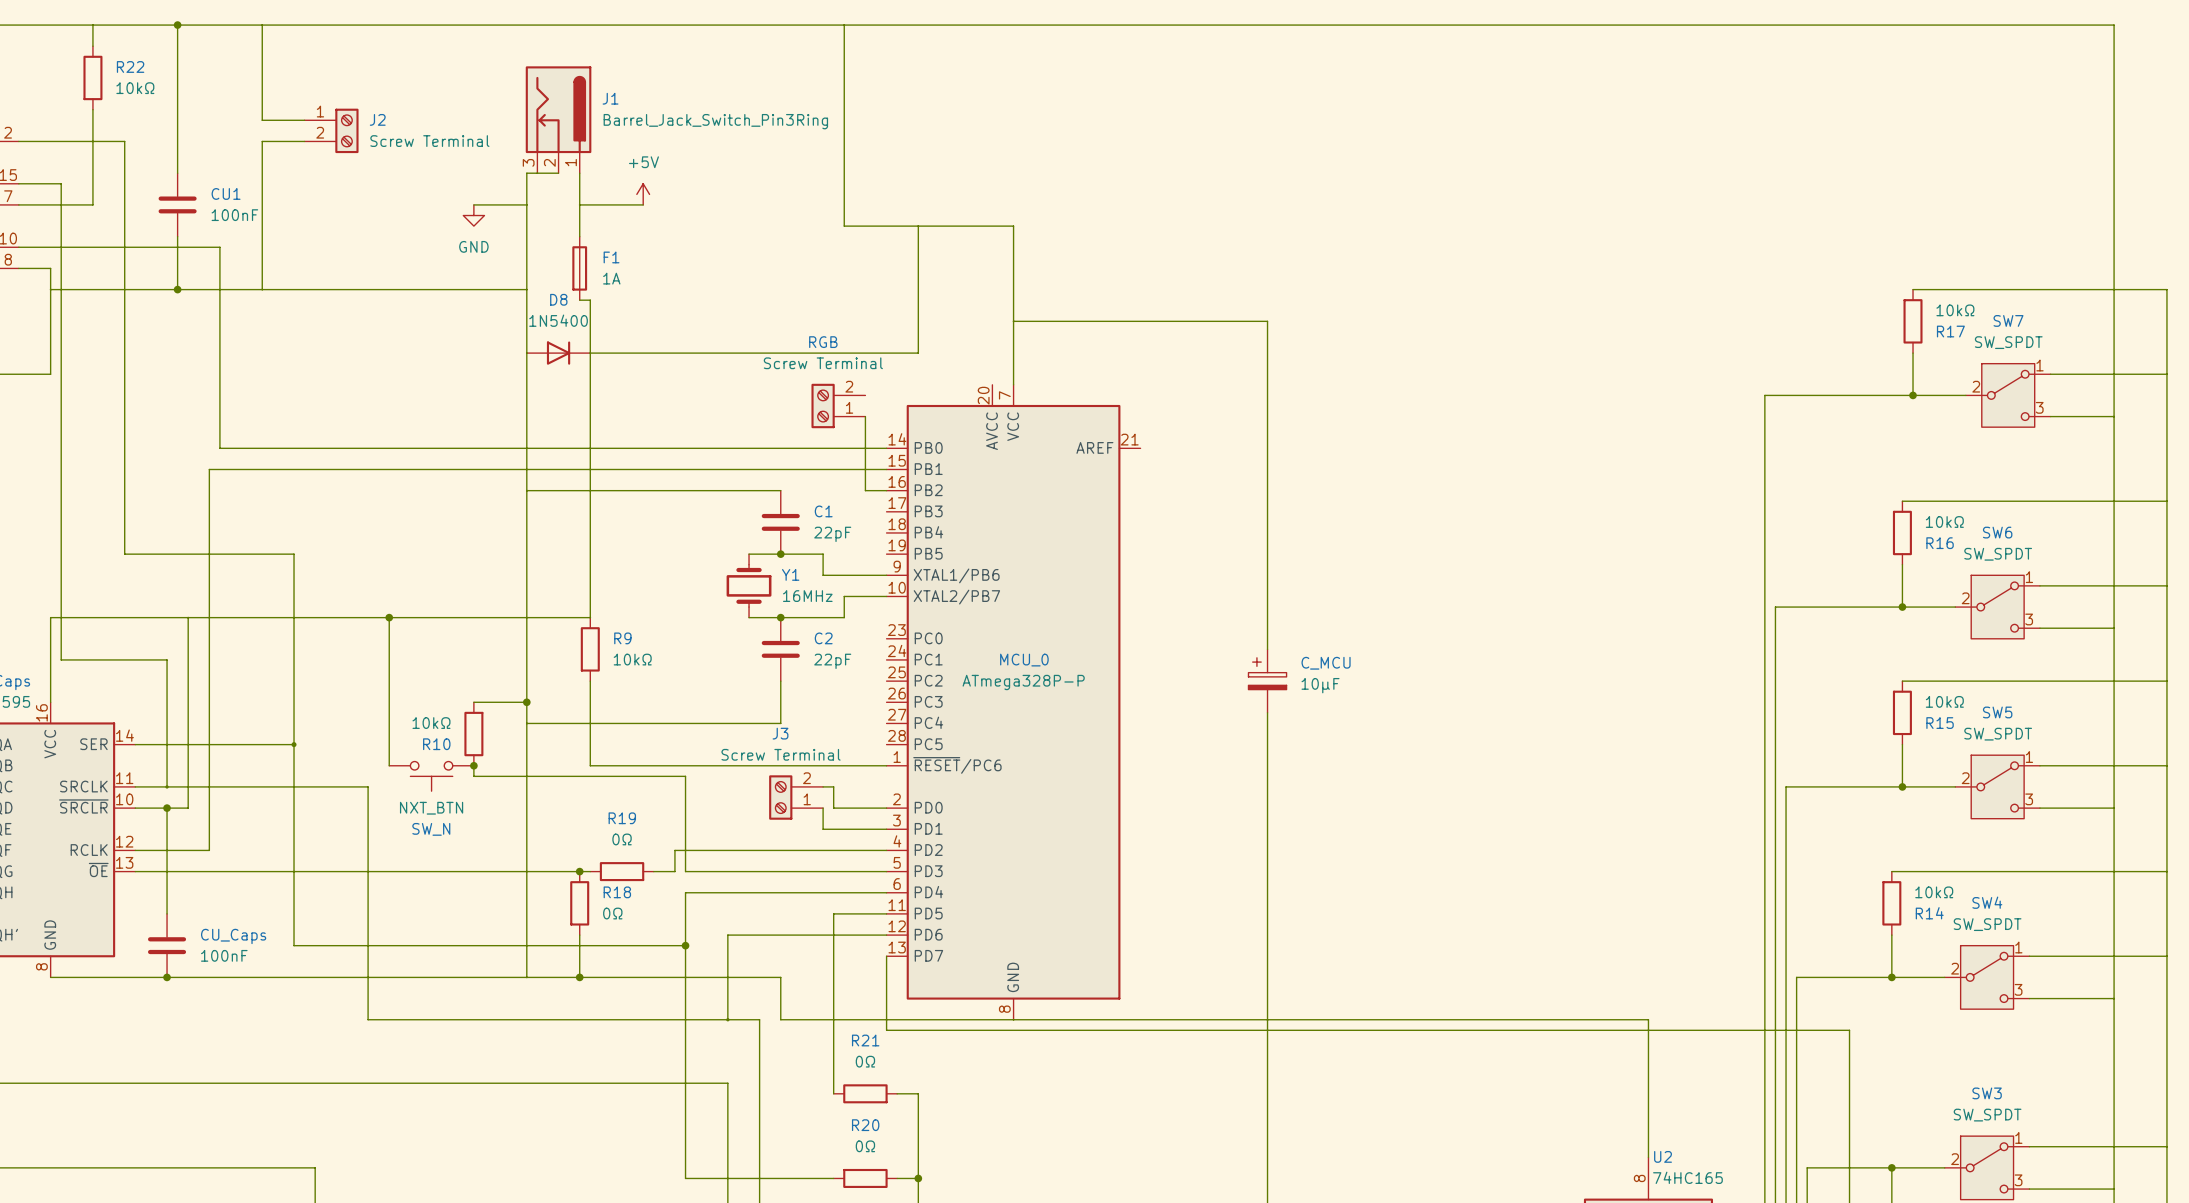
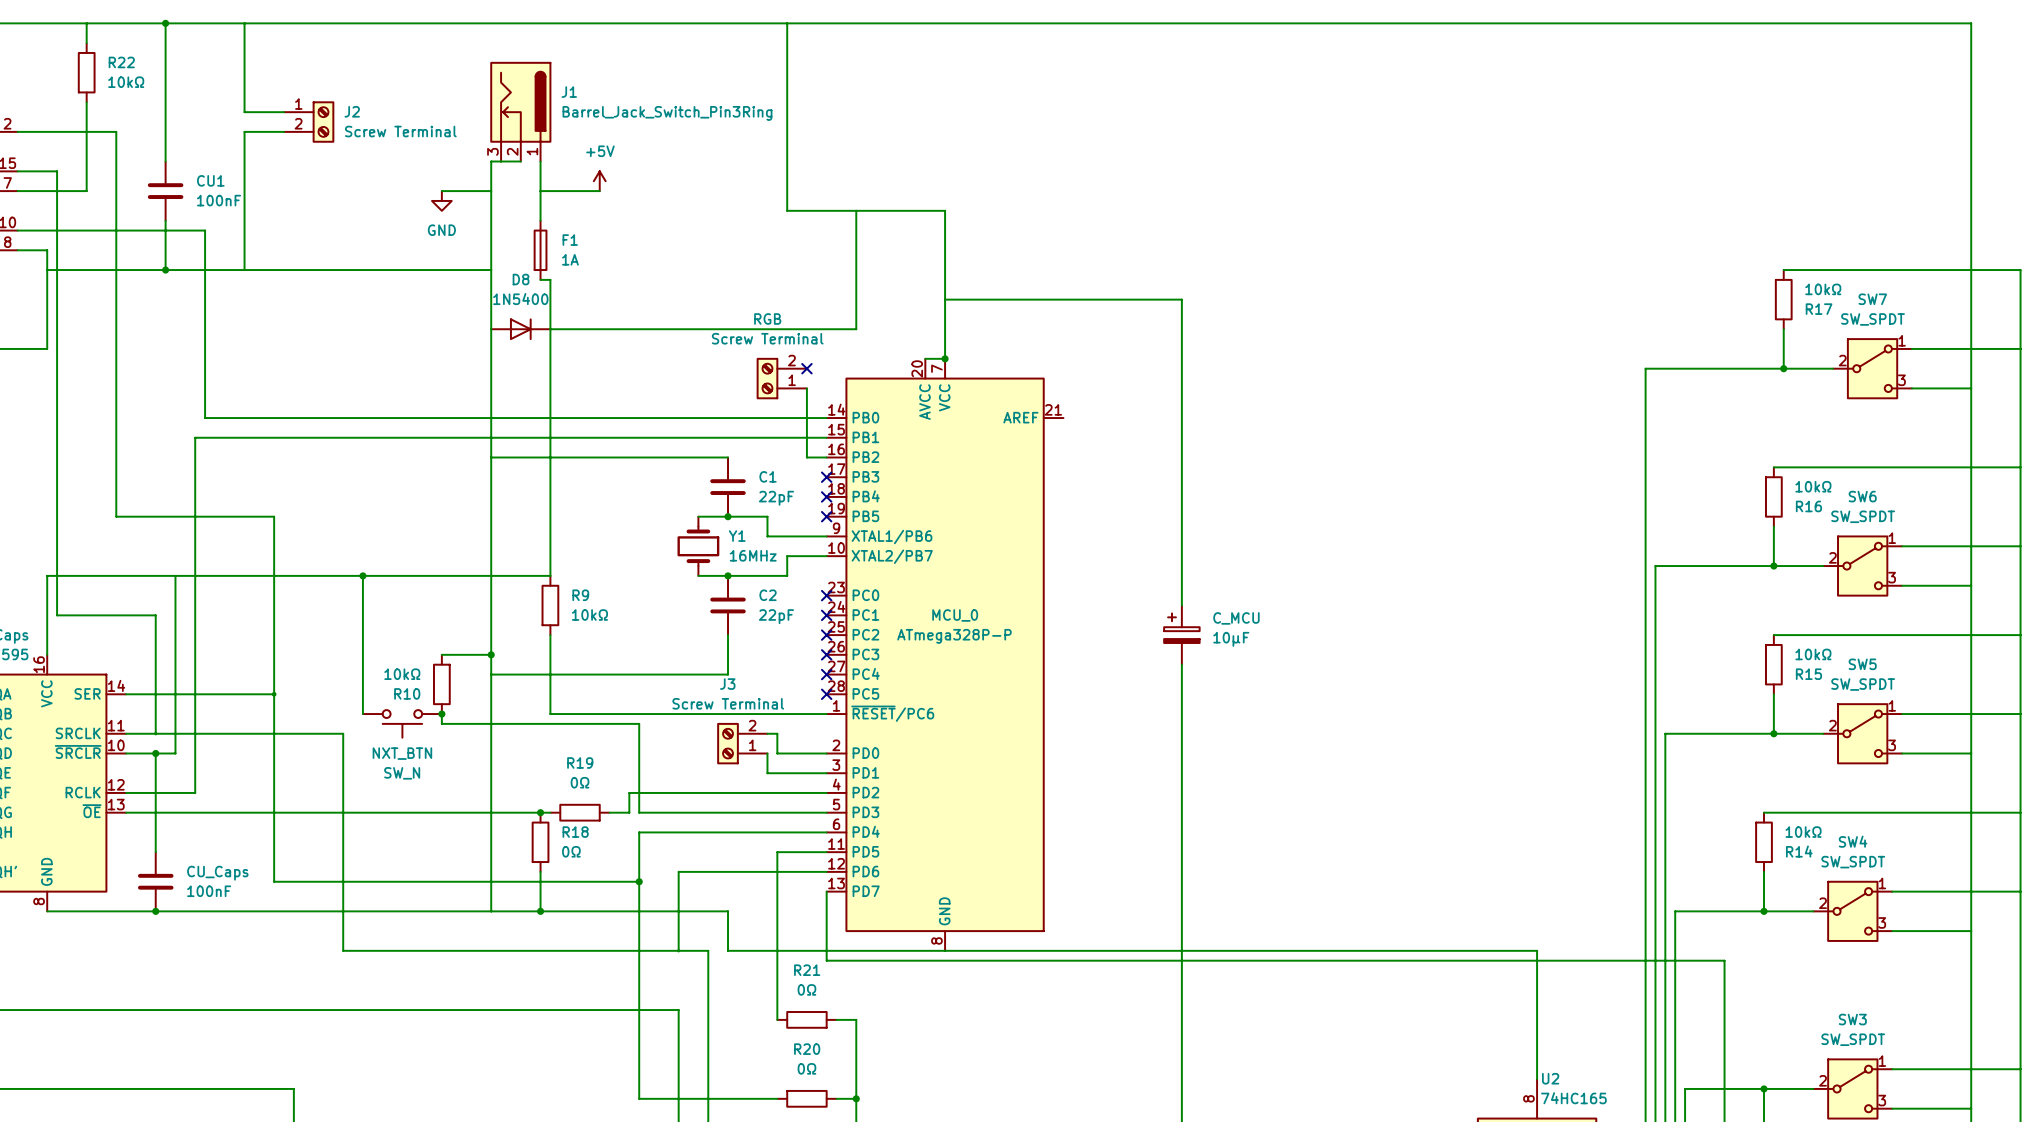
wire: none -> (925, 358) (945, 358)
junction: none -> (945, 358)
no-connect mark: none -> (806, 368)
no-connect mark: none -> (826, 477)
no-connect mark: none -> (826, 496)
no-connect mark: none -> (826, 516)
no-connect mark: none -> (826, 595)
no-connect mark: none -> (826, 615)
no-connect mark: none -> (826, 635)
no-connect mark: none -> (826, 654)
no-connect mark: none -> (826, 674)
no-connect mark: none -> (826, 694)

